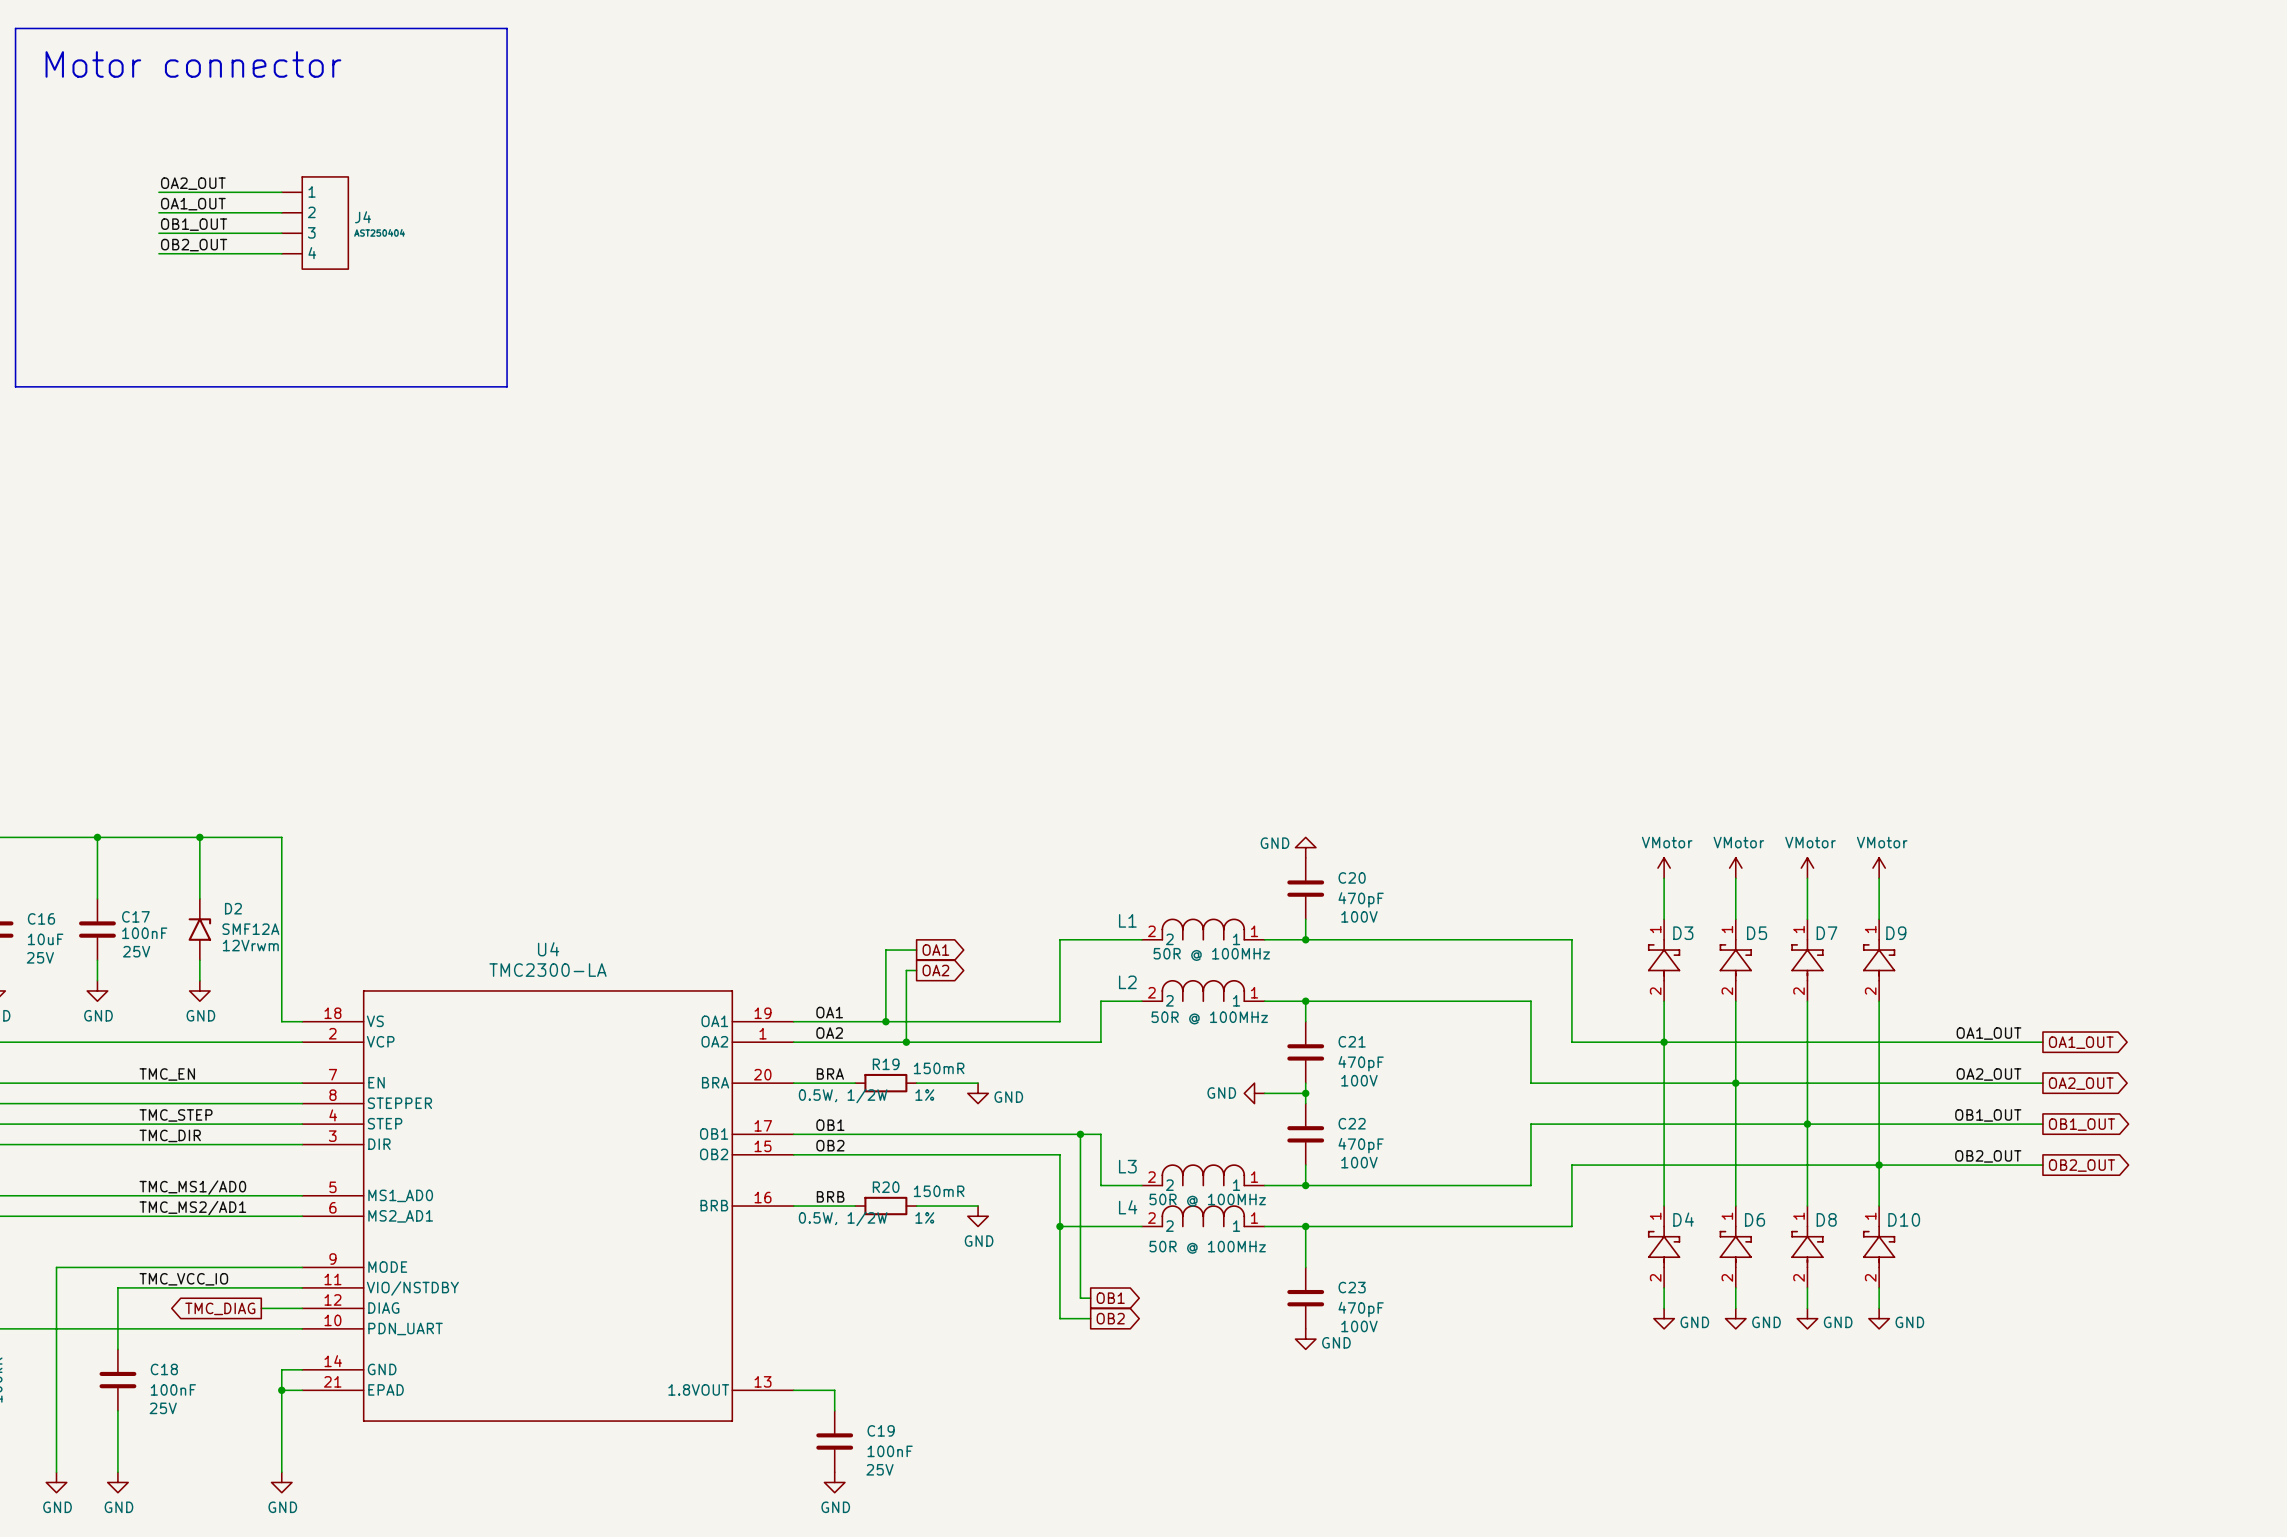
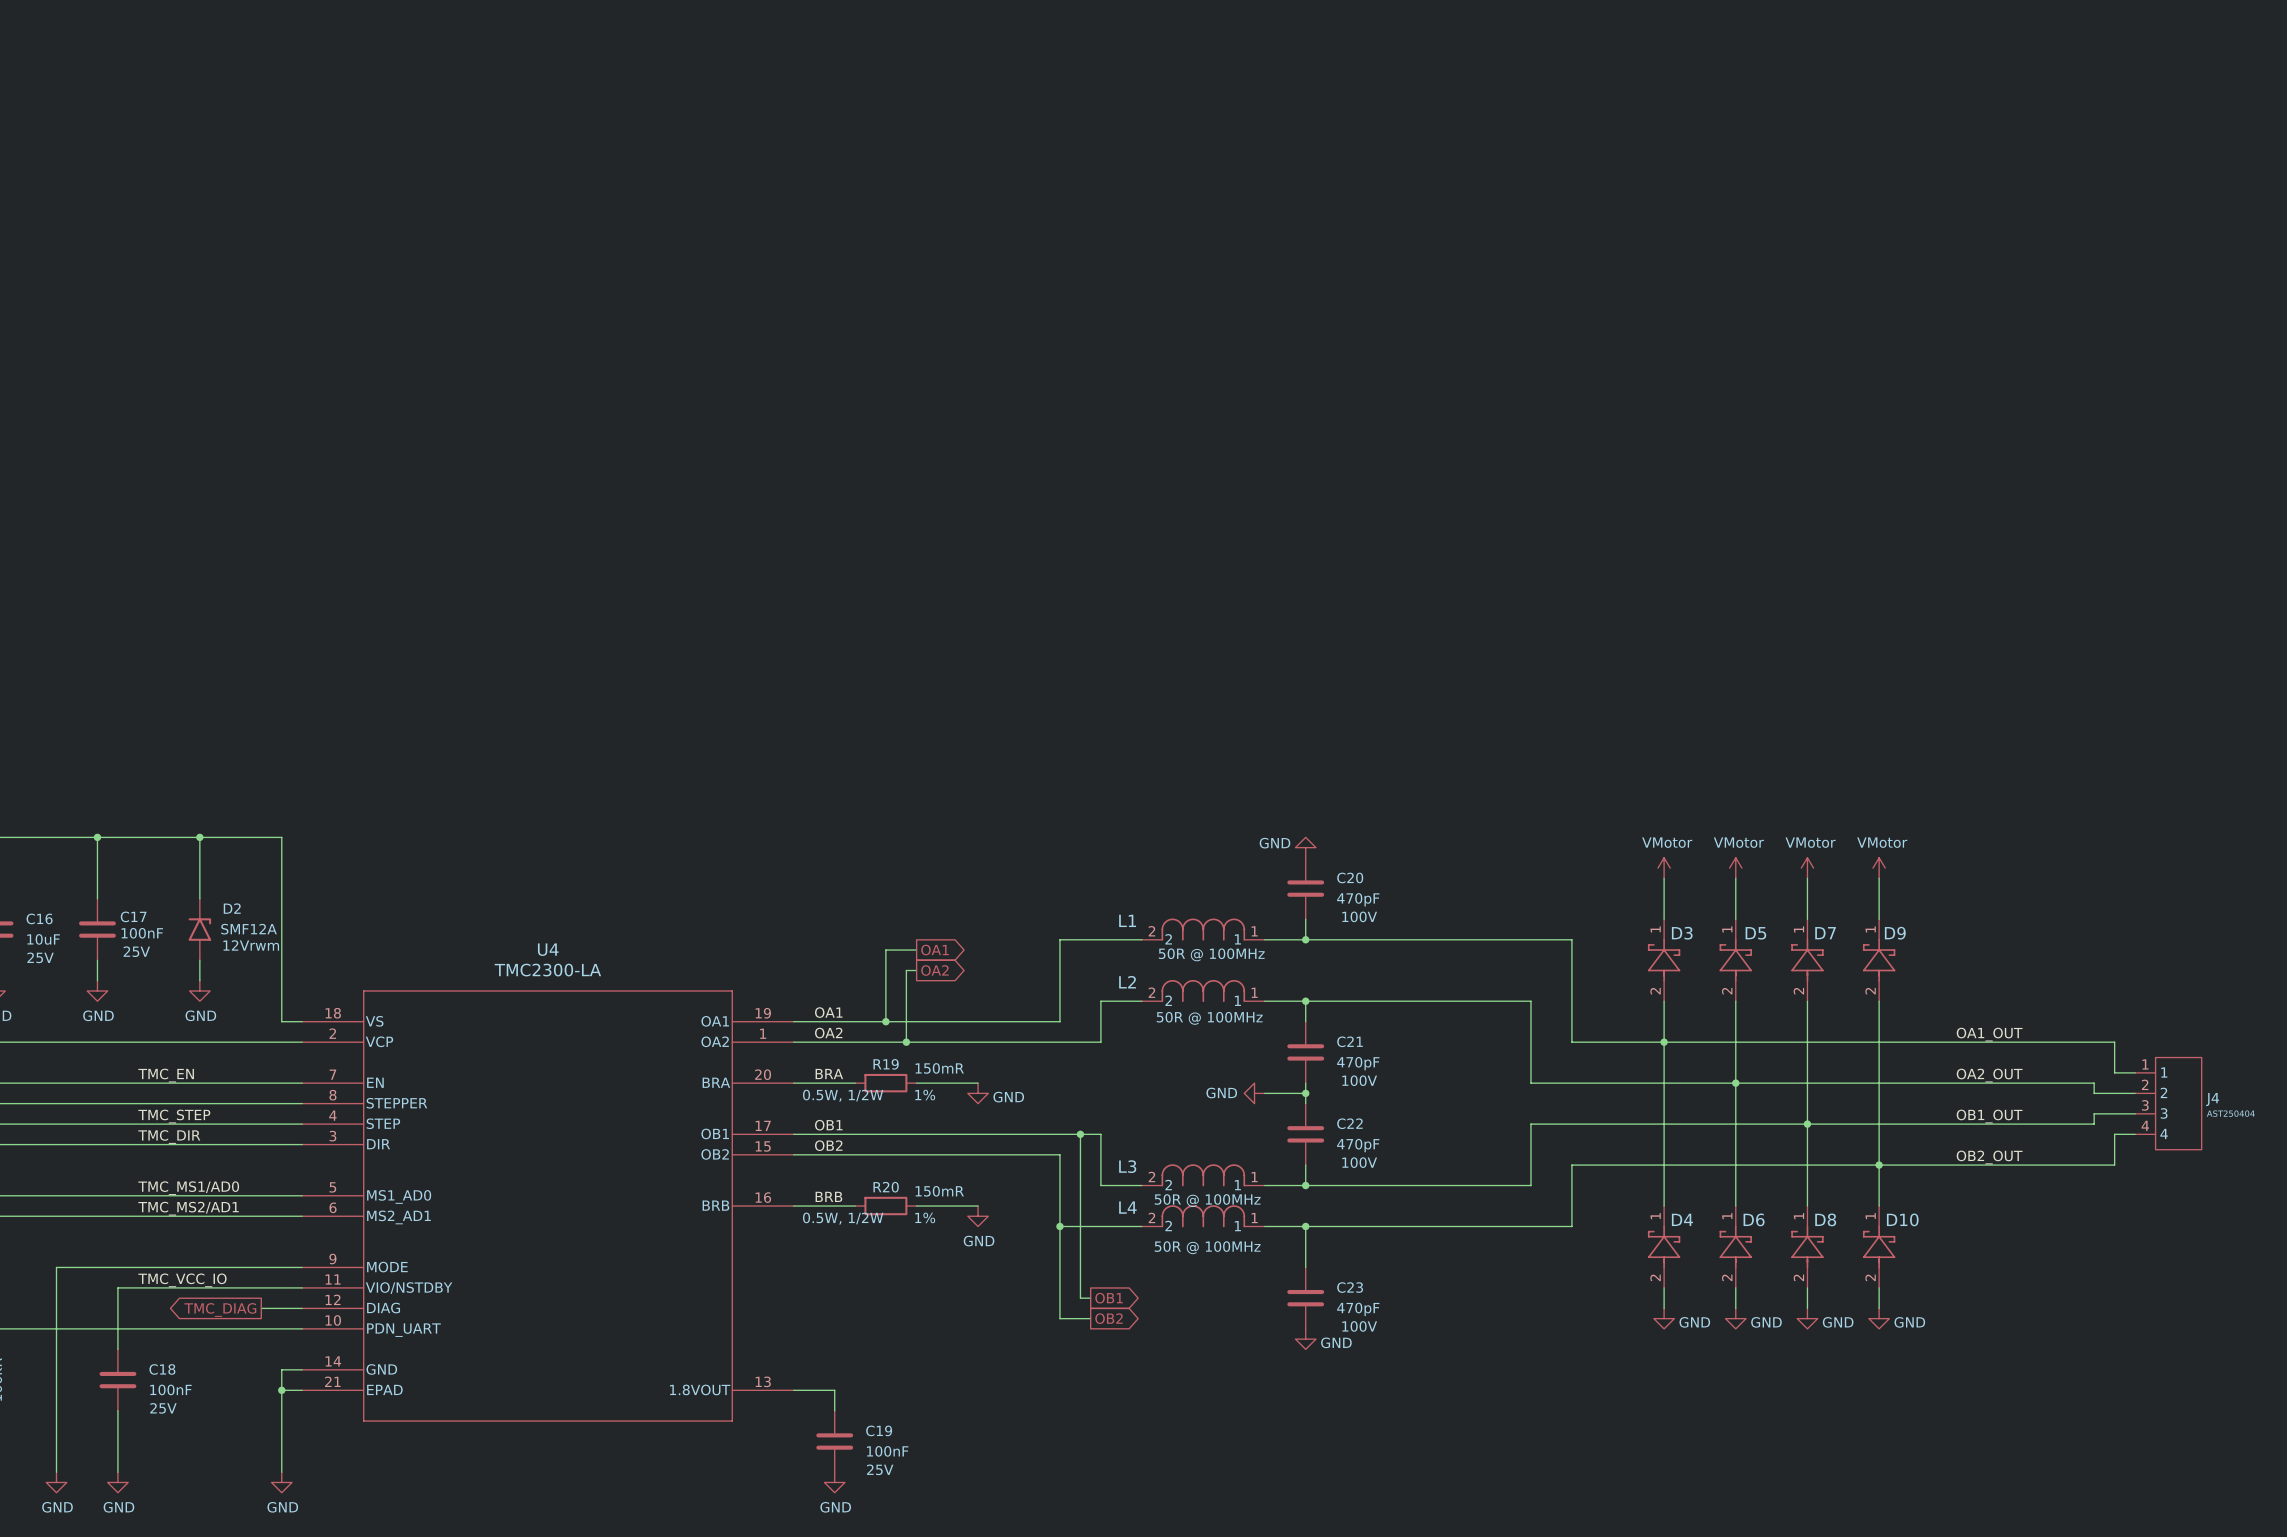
line: (15, 28) (507, 28) (507, 386) (15, 386) (15, 28) -> none
text: Motor connector (193, 64) -> none
label: OA2_OUT (193, 183) -> none
wire: (158, 192) (281, 192) -> none
label: OA1_OUT (193, 204) -> none
wire: (158, 212) (281, 212) -> none
J4 position: (315, 223) -> (2168, 1103)
label: OB1_OUT (194, 224) -> none
wire: (158, 233) (281, 233) -> none
label: OB2_OUT (194, 245) -> none
wire: (158, 253) (281, 253) -> none
wire: none -> (2042, 1042) (2114, 1042) (2114, 1072) (2135, 1072)
global label: OA1_OUT (2081, 1042) -> none
J4 pin number: none -> 1 (2145, 1064)
wire: none -> (2042, 1083) (2094, 1083) (2094, 1093) (2135, 1093)
global label: OA2_OUT (2081, 1083) -> none
J4 pin number: none -> 2 (2145, 1084)
J4 pin number: none -> 3 (2145, 1105)
wire: none -> (2135, 1113) (2094, 1113) (2094, 1124) (2042, 1124)
global label: OB1_OUT (2081, 1124) -> none
J4 pin number: none -> 4 (2145, 1125)
wire: none -> (2135, 1134) (2114, 1134) (2114, 1165) (2042, 1165)
global label: OB2_OUT (2081, 1165) -> none

